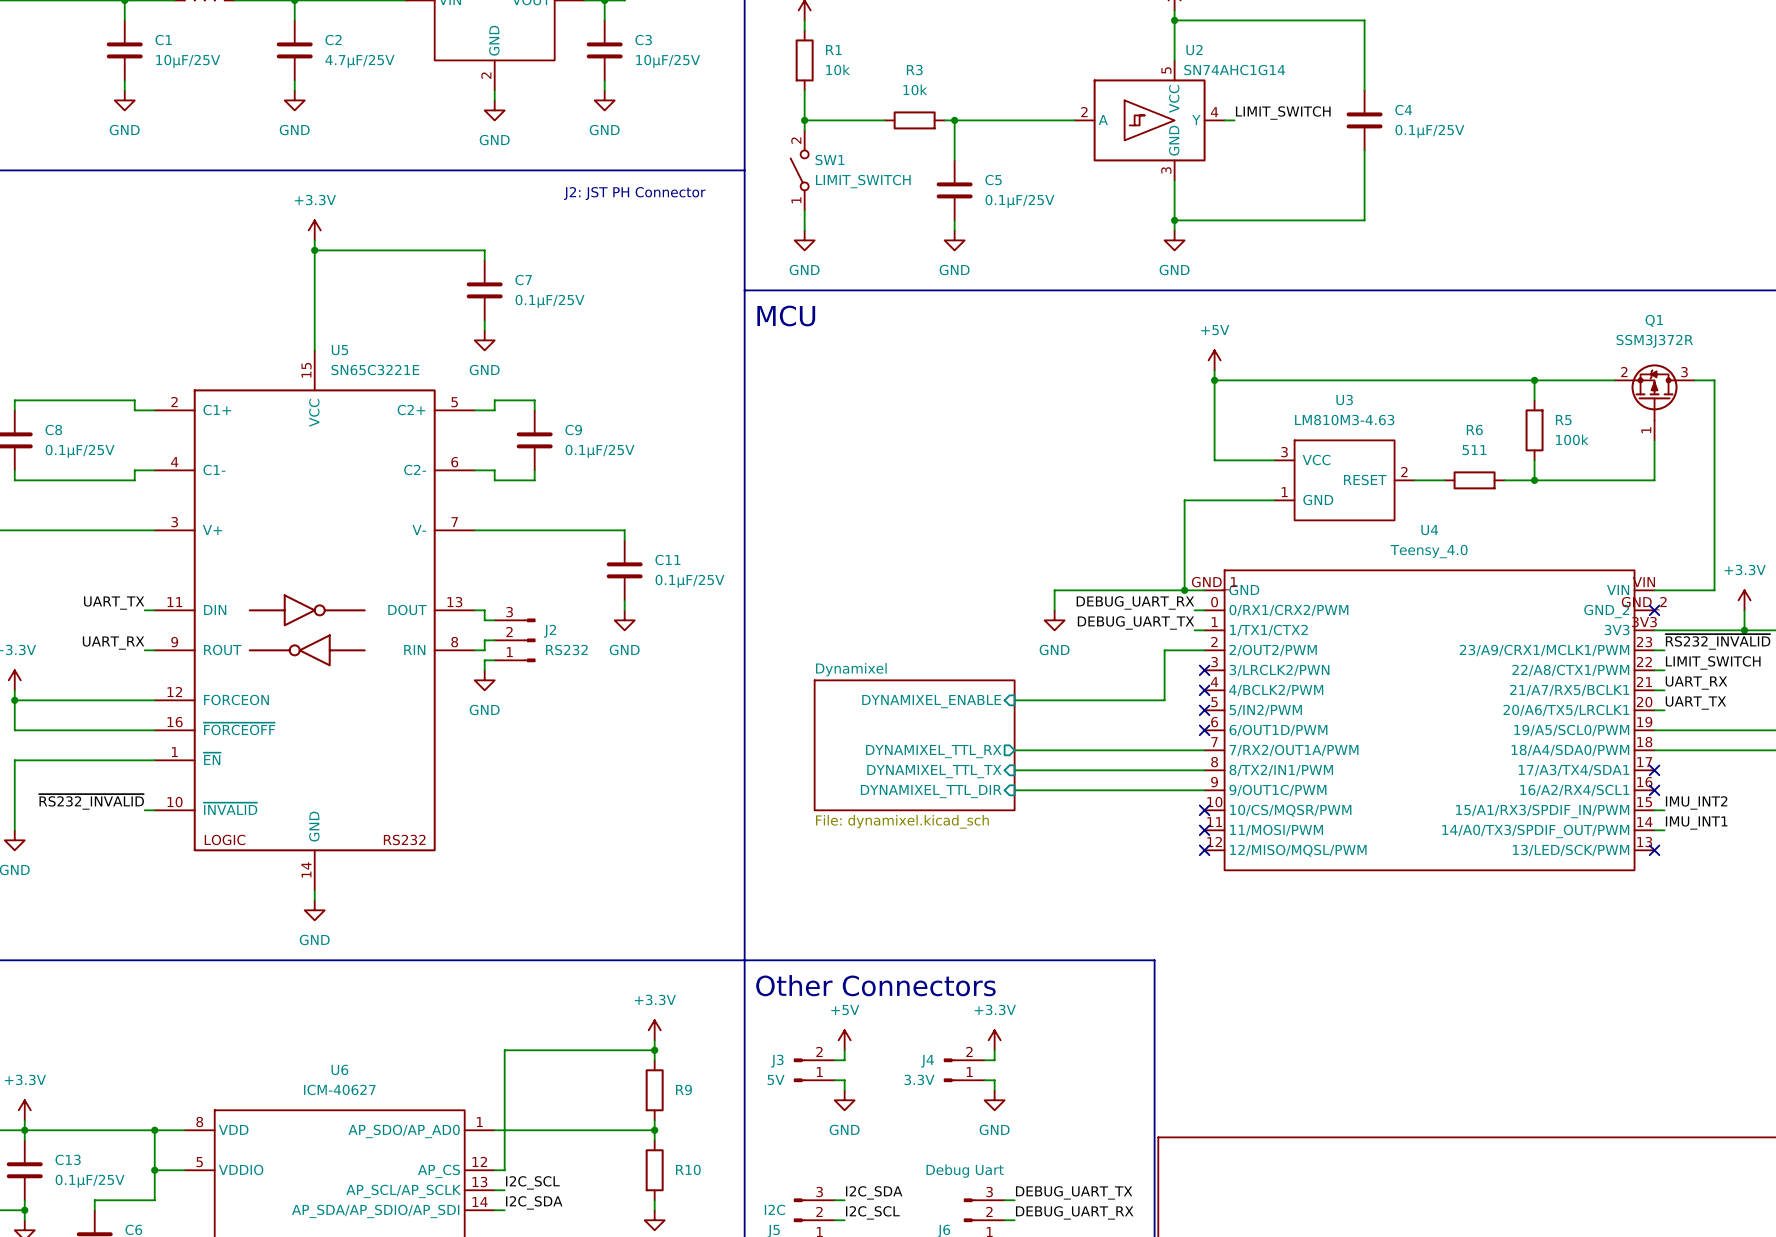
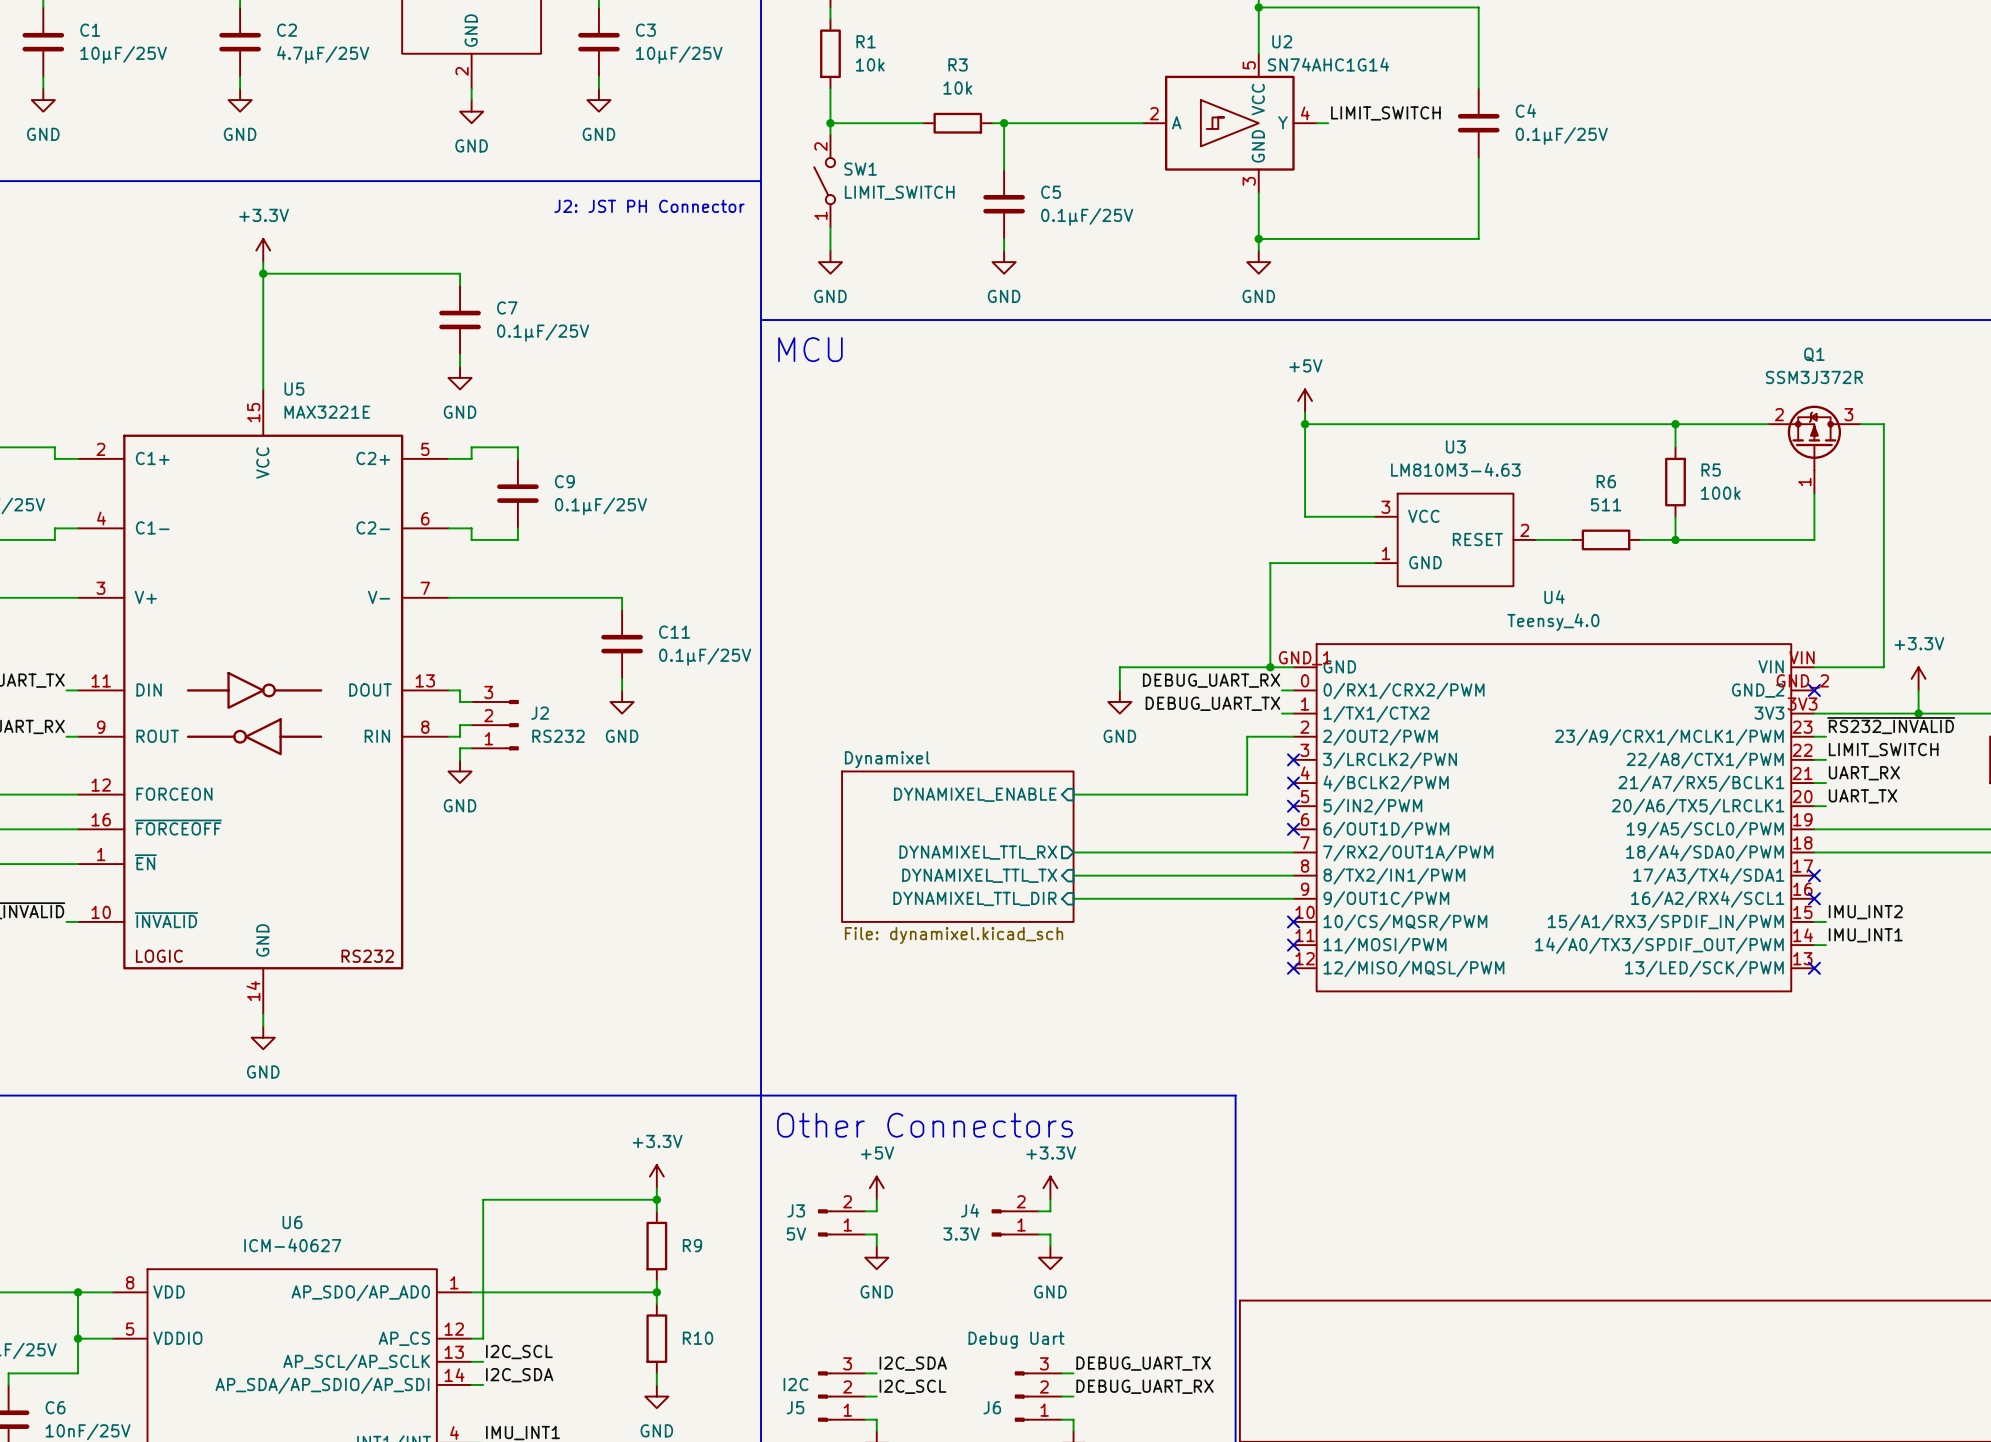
U5 value: SN65C3221E (375, 370) -> MAX3221E (327, 412)

